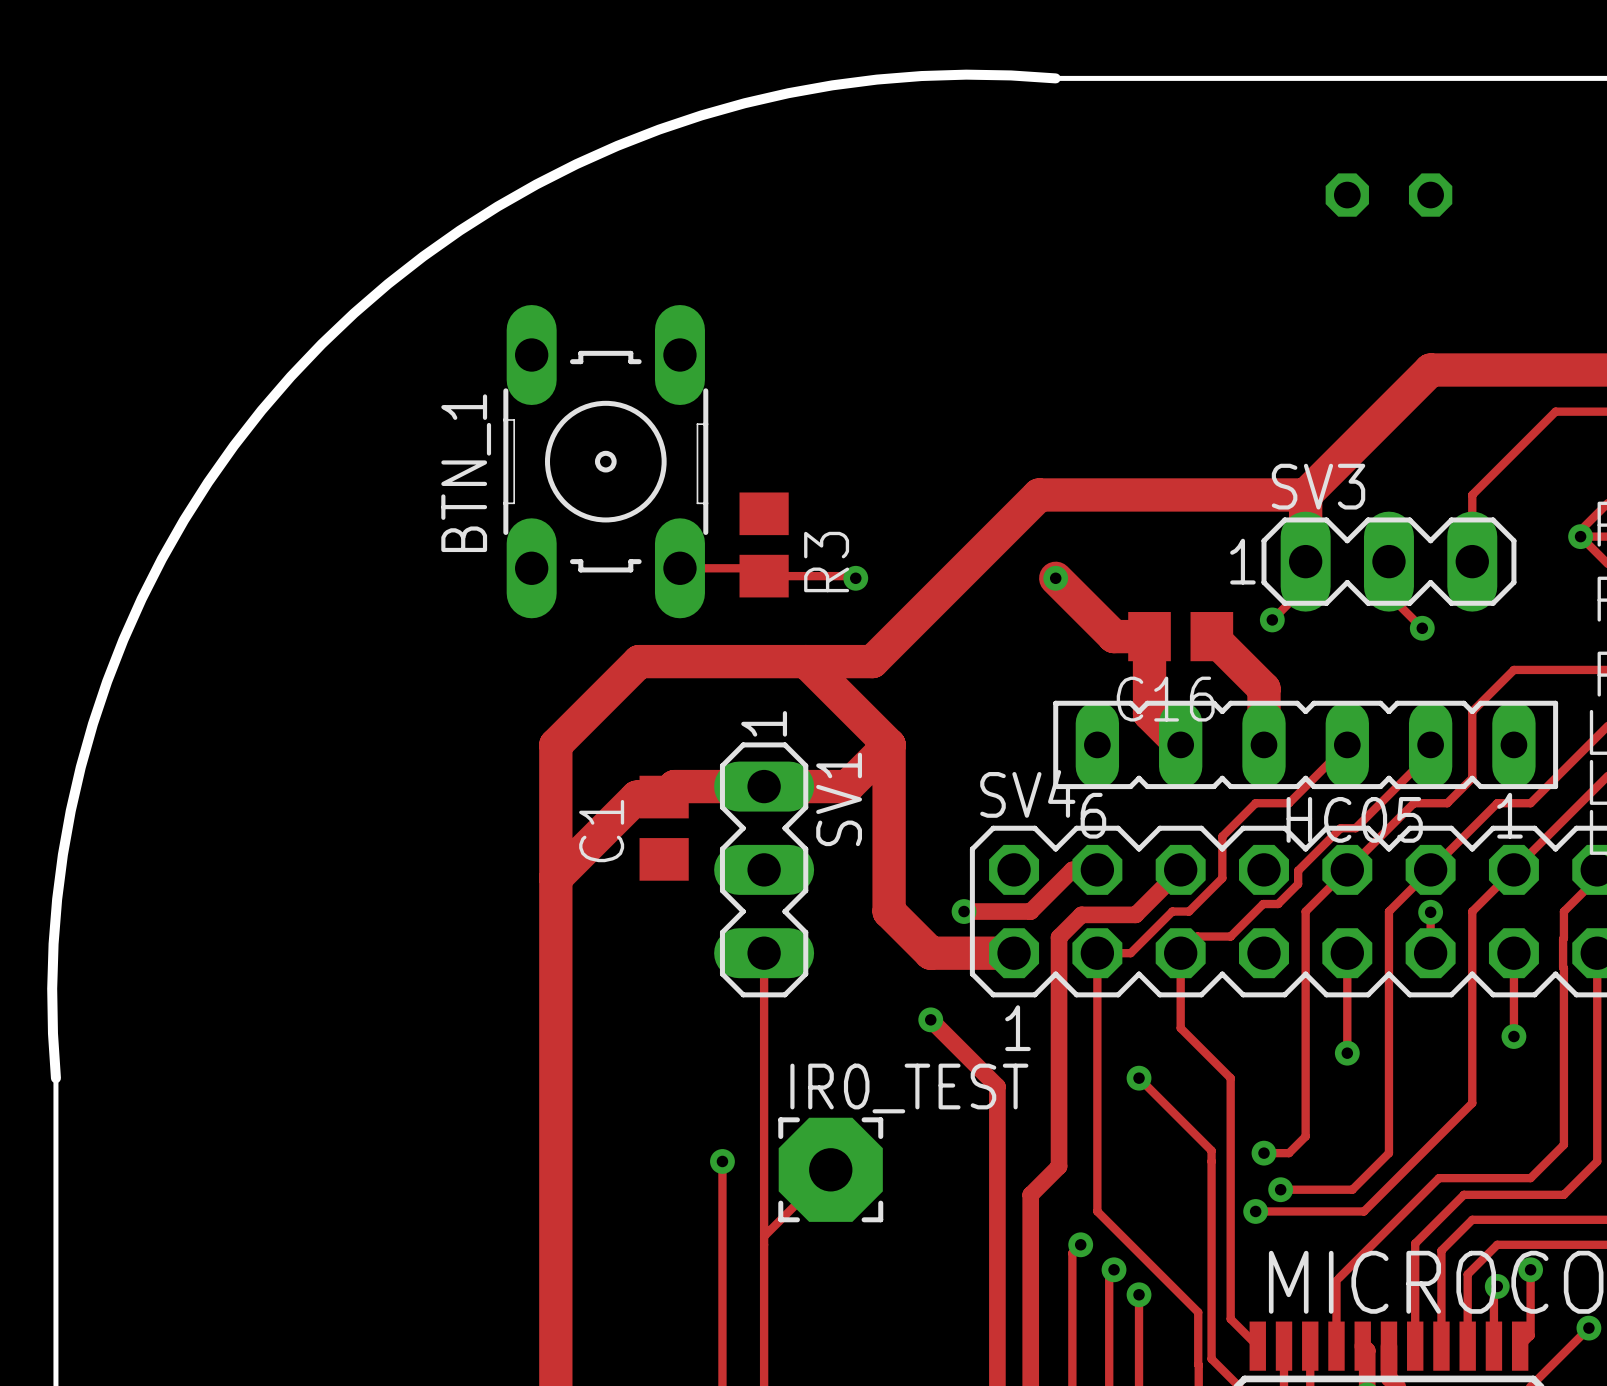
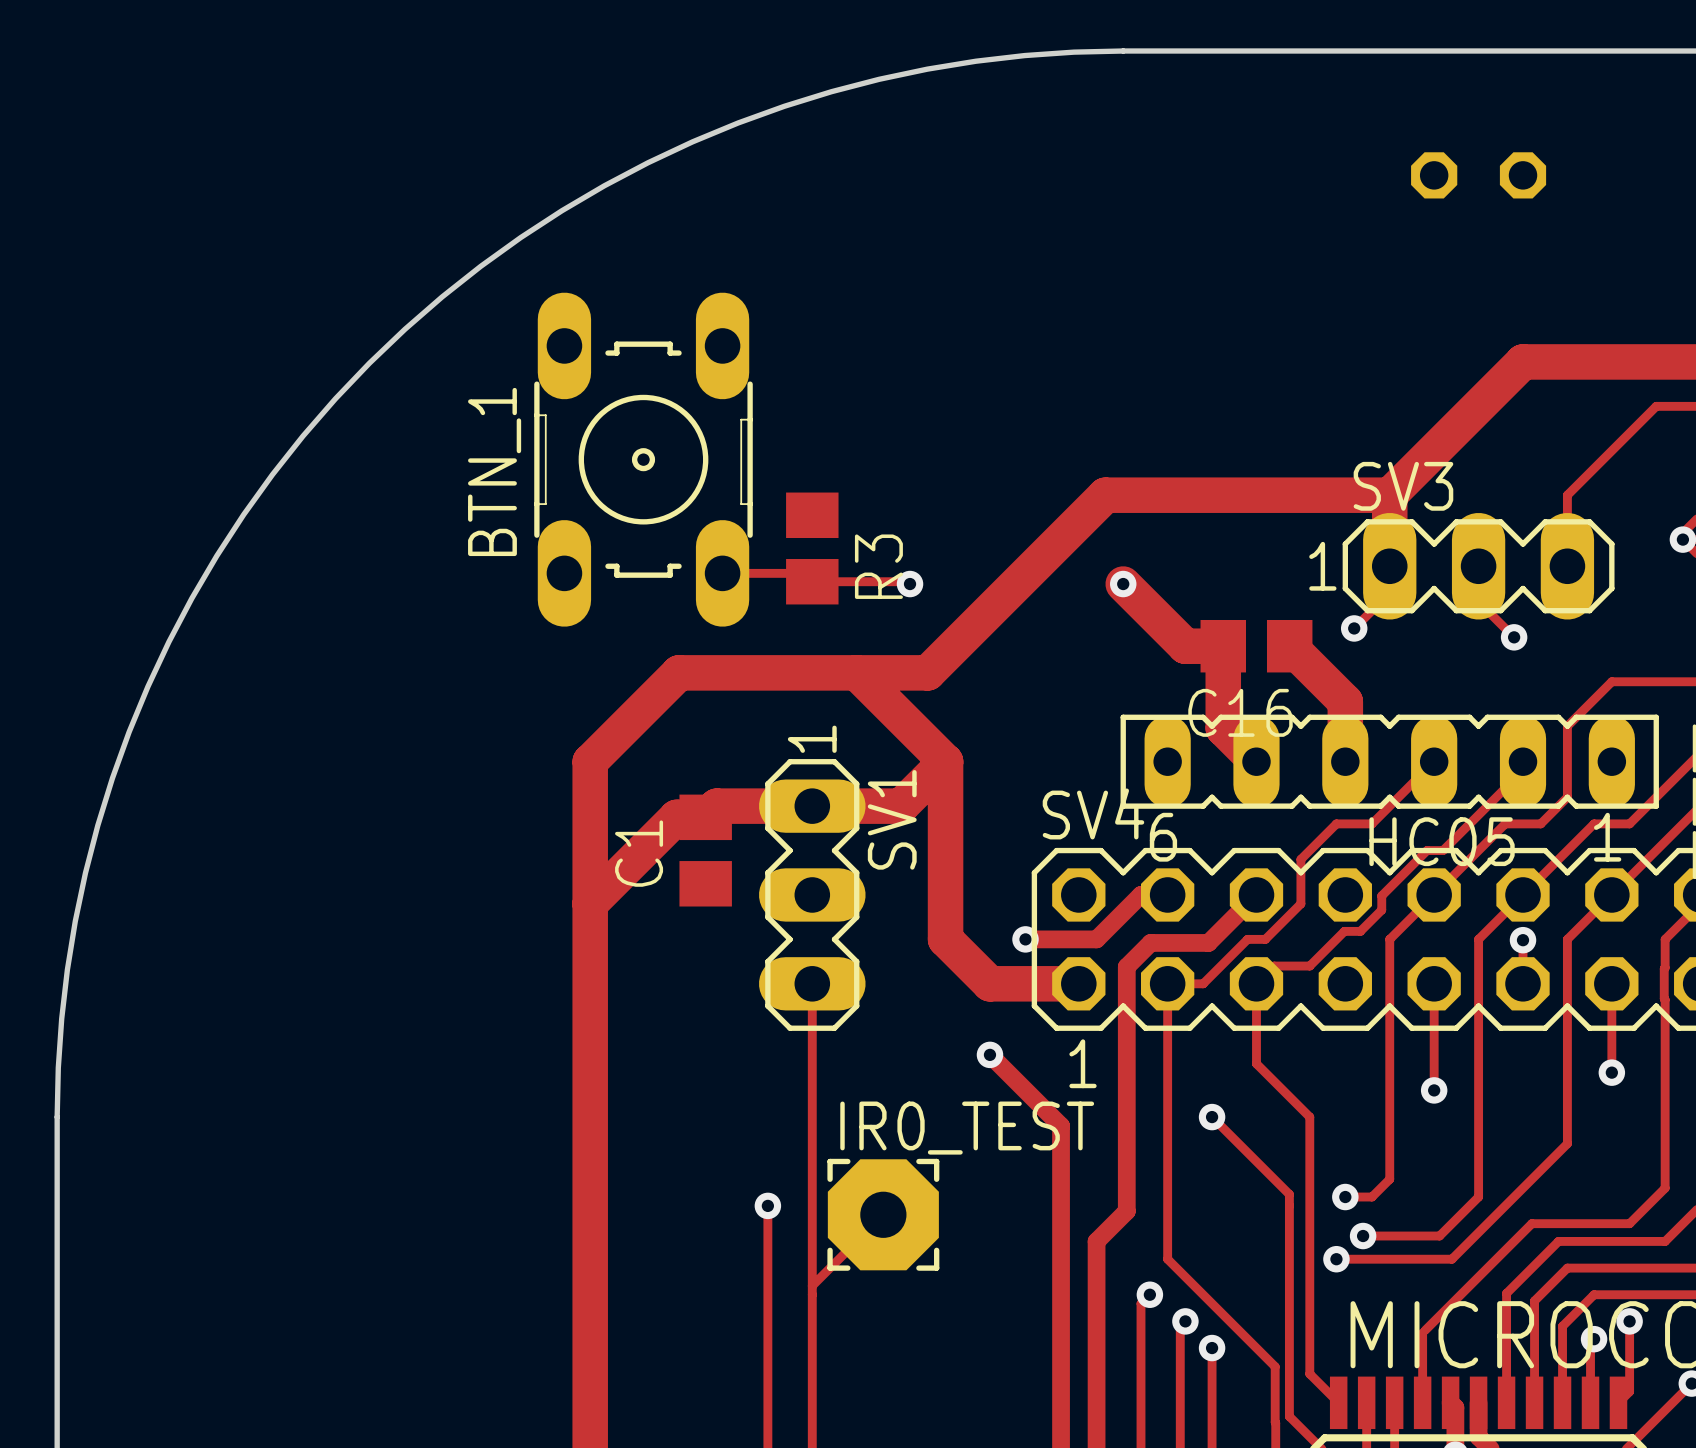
board edge: (1055, 78) (966, 74) (876, 79) (788, 93) (701, 115) (659, 129) (576, 164) (497, 206) (423, 256) (354, 313) (321, 344) (290, 376) (233, 445) (184, 520) (141, 598) (107, 681) (92, 724) (70, 810) (57, 899) (52, 988) (55, 1078) -> (1123, 51) (1024, 55) (927, 69) (831, 91) (738, 122) (648, 162) (562, 210) (480, 266) (442, 296) (369, 363) (303, 436) (272, 474) (216, 555) (168, 641) (129, 731) (97, 825) (75, 921) (61, 1018) (57, 1117)

